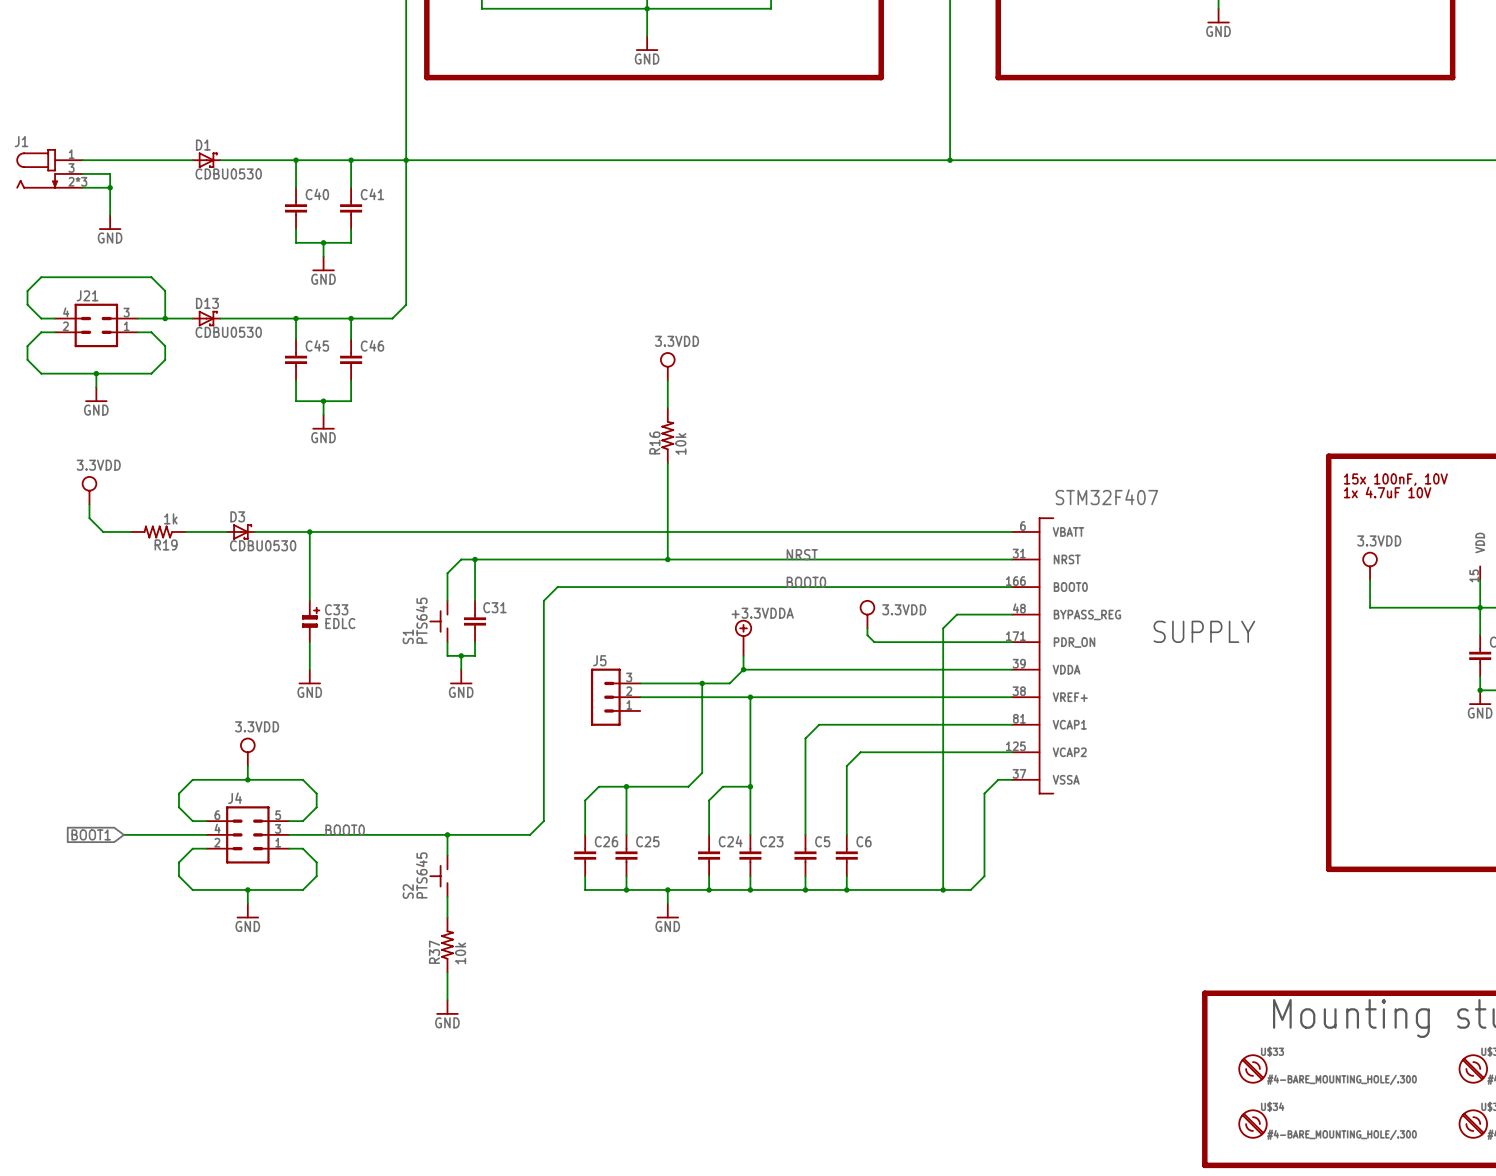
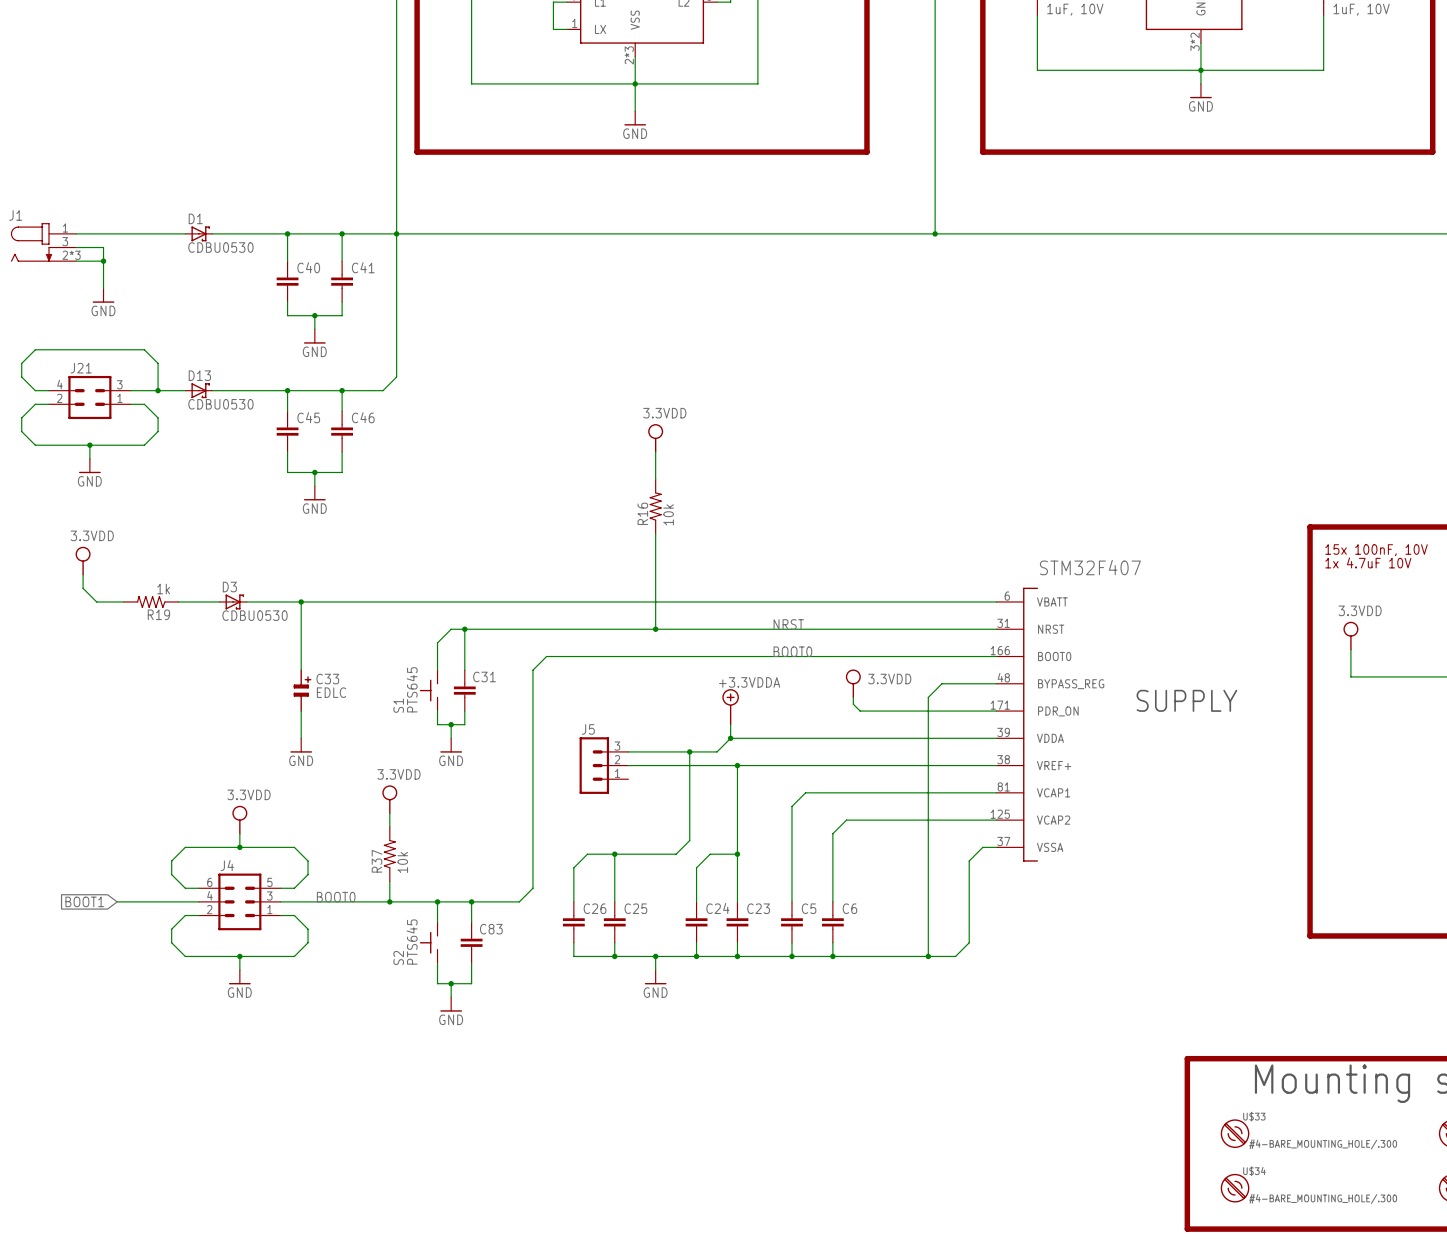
power symbol: none -> 3.3VDD (389, 799)
wire: none -> (389, 813) (389, 826)
wire: none -> (389, 881) (389, 901)
junction: none -> (389, 901)
wire: none -> (471, 901) (471, 922)
junction: none -> (471, 901)
C83: none -> (471, 942)
wire: none -> (471, 963) (471, 983) (437, 983)
wire: none -> (451, 983) (451, 997)
junction: none -> (451, 983)
R37 position: (447, 945) -> (389, 854)
wire: (447, 972) (447, 1000) -> none
power symbol position: GND (447, 1007) -> GND (451, 1004)

